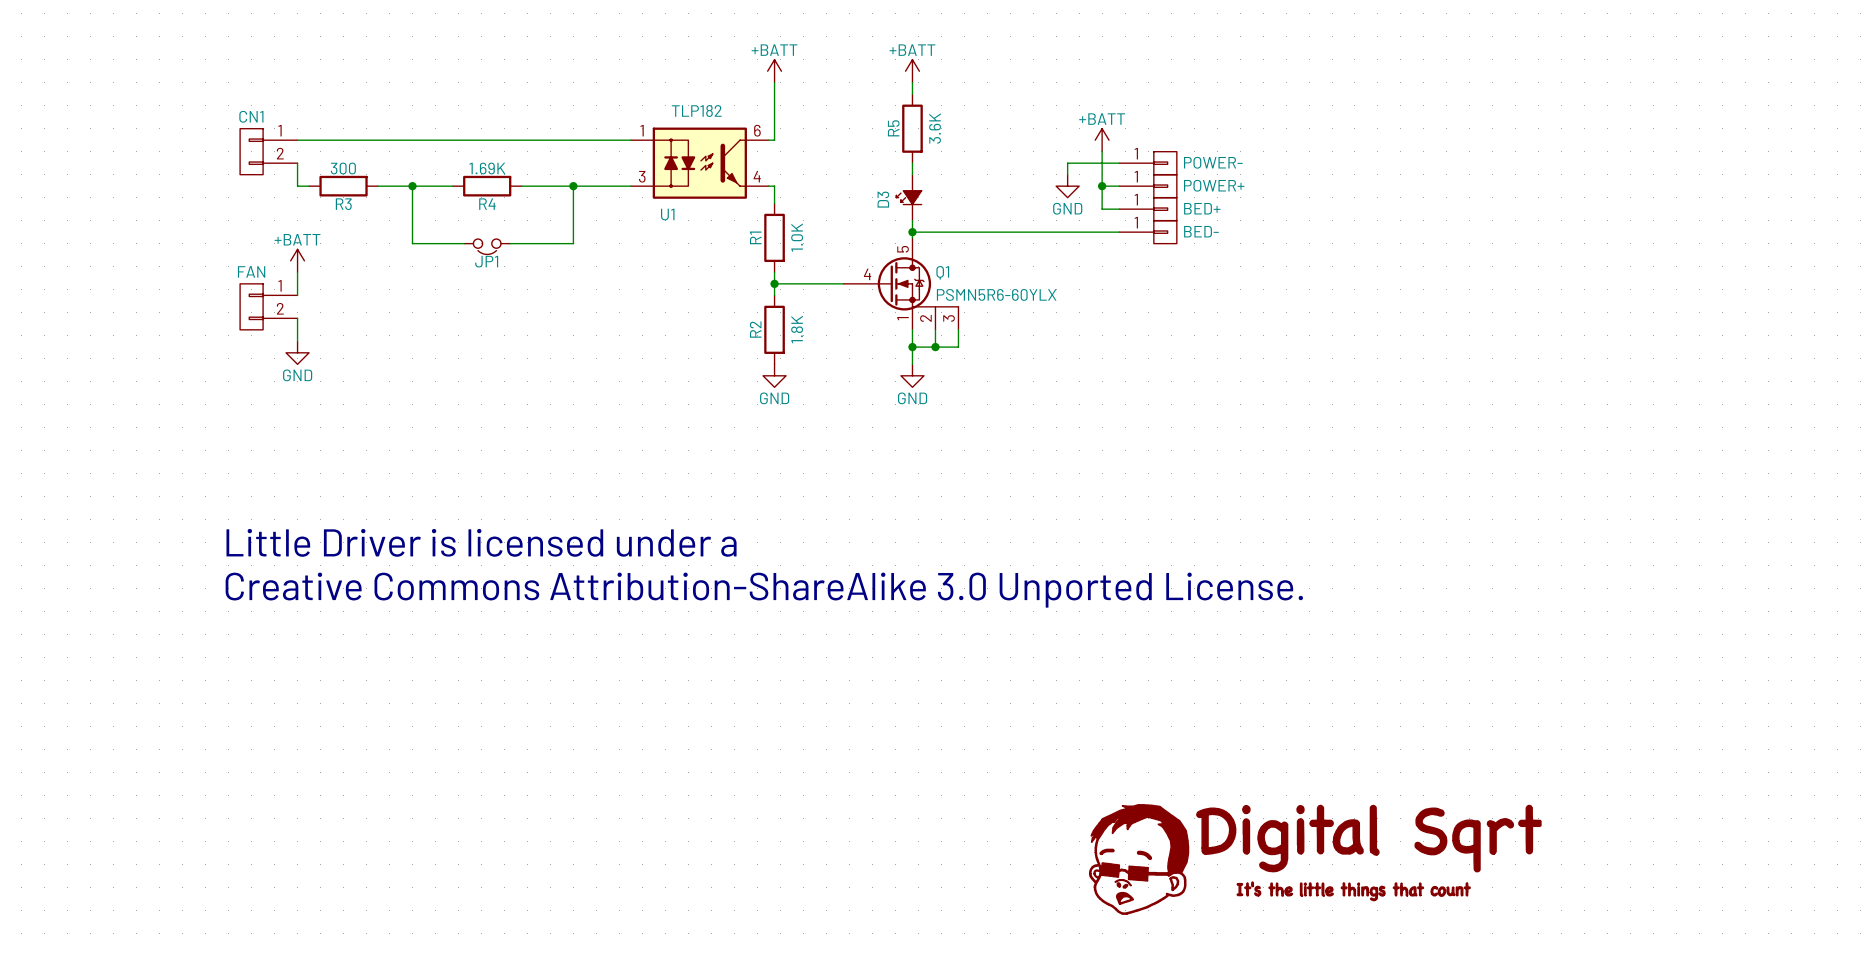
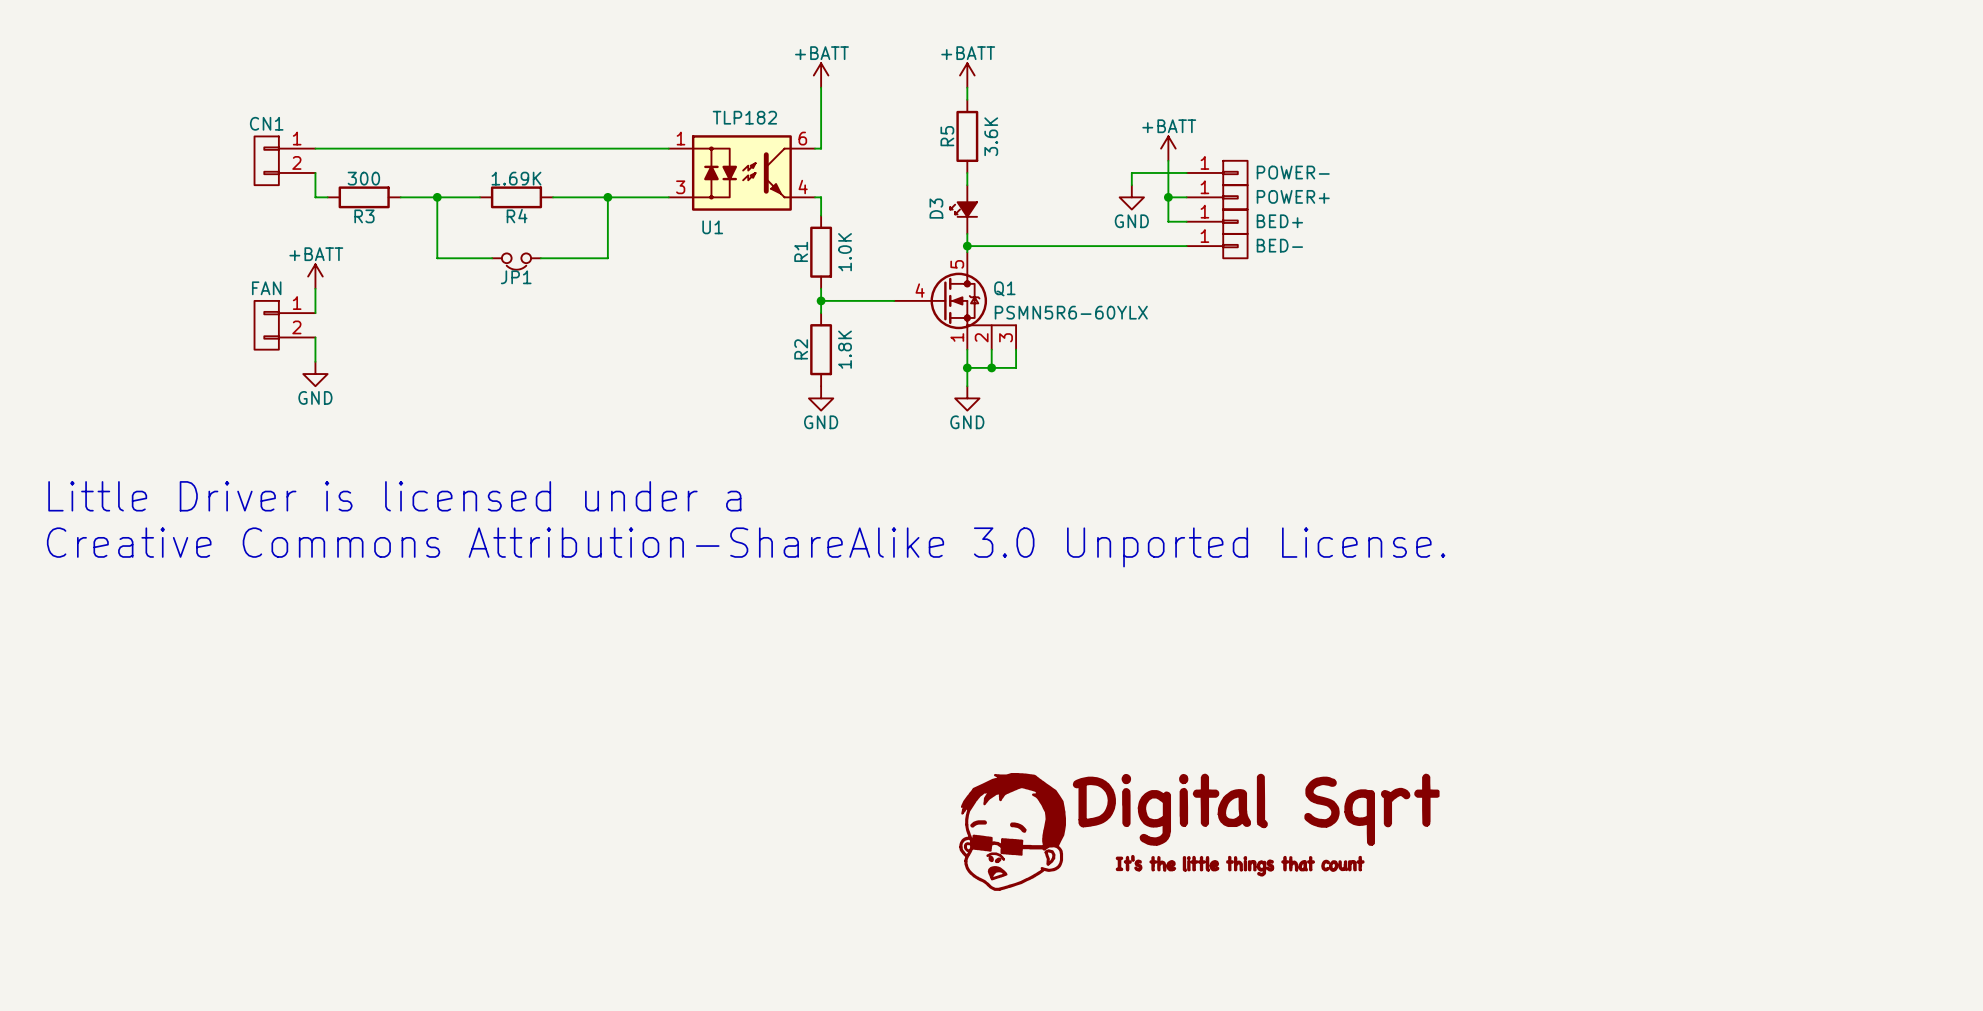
text position: Little Driver is licensed under a (481, 542) -> Little Driver is licensed under a (394, 496)
text position: Creative Commons Attribution-ShareAlike 3.0 Unported License. (764, 590) -> Creative Commons Attribution-ShareAlike 3.0 Unported License. (746, 547)
power symbol position: (1315, 859) -> (1199, 831)

